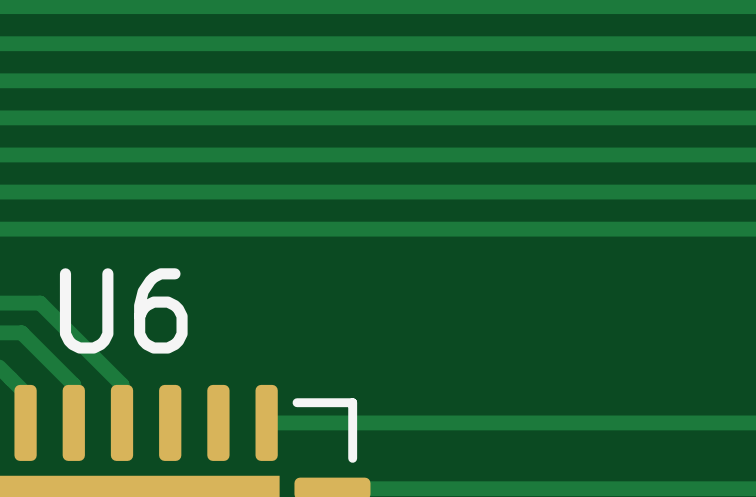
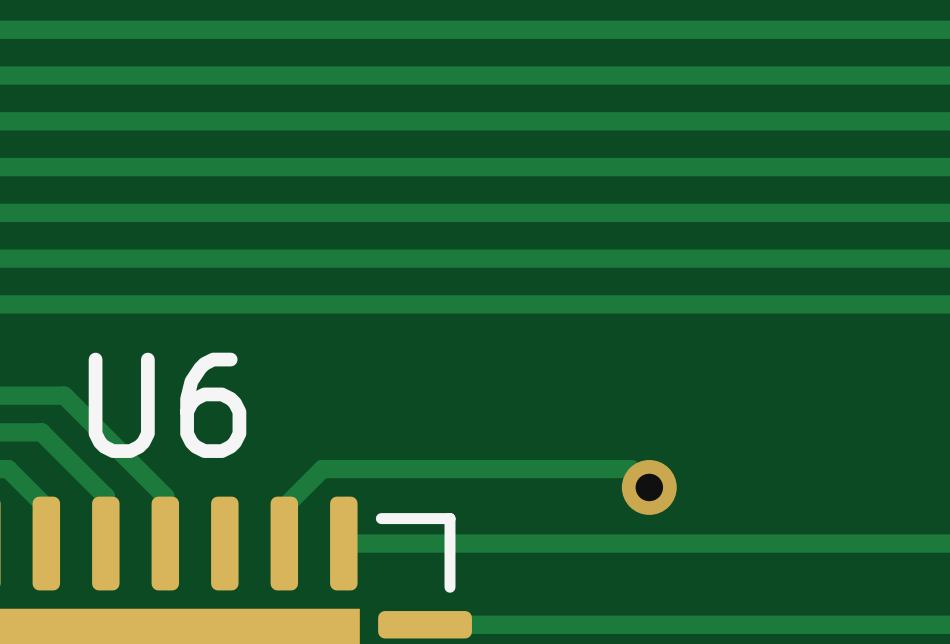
track: none -> (649, 487) (630, 469) (322, 469) (284, 507) (284, 543)
via: none -> (649, 487)

